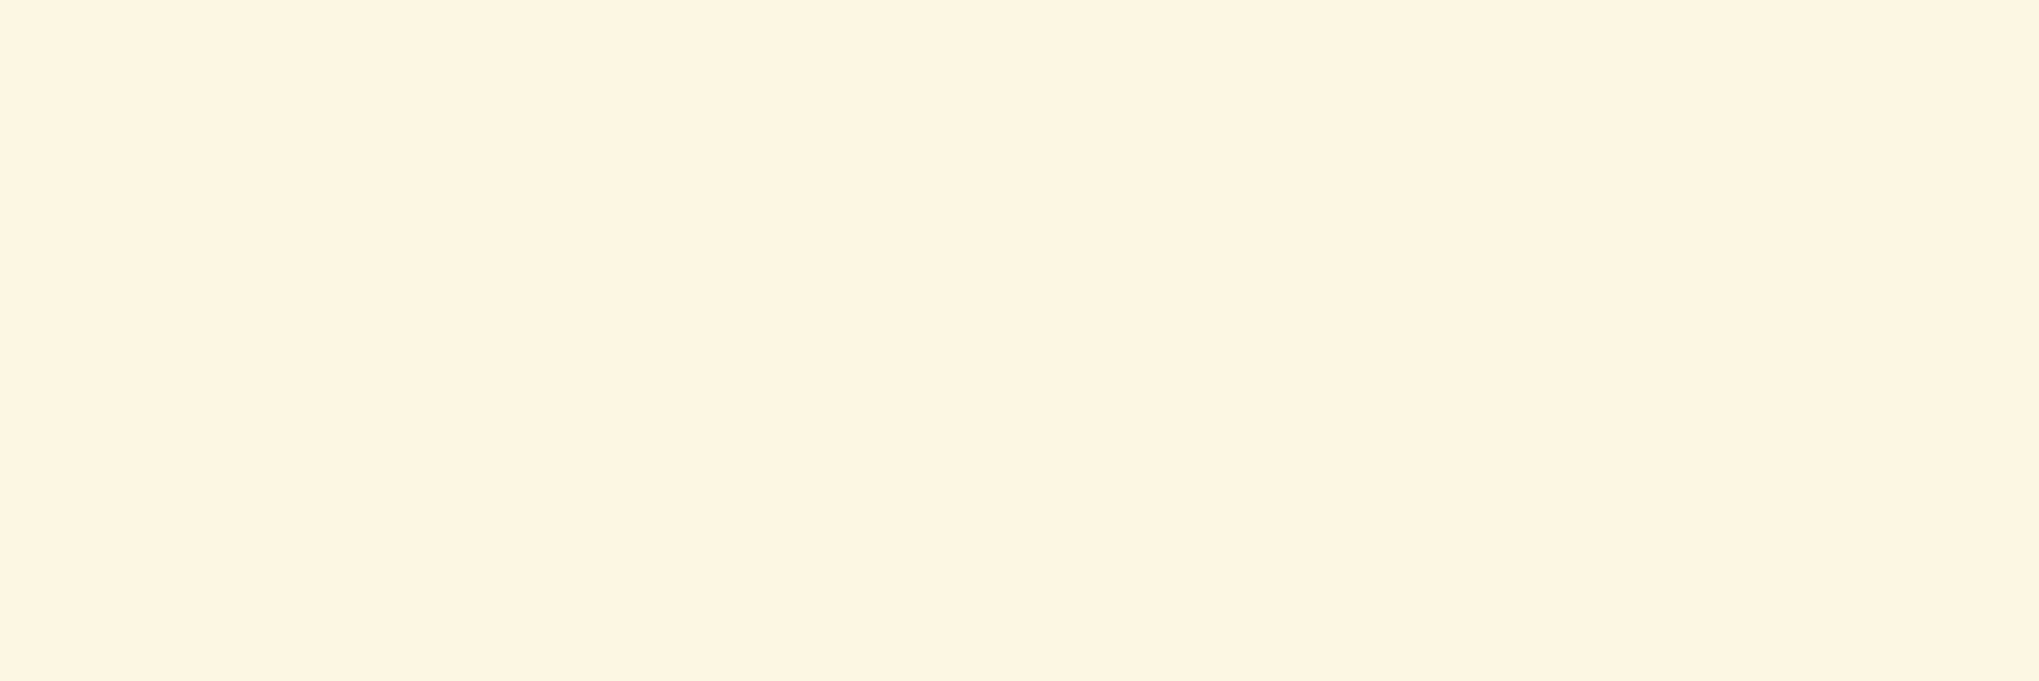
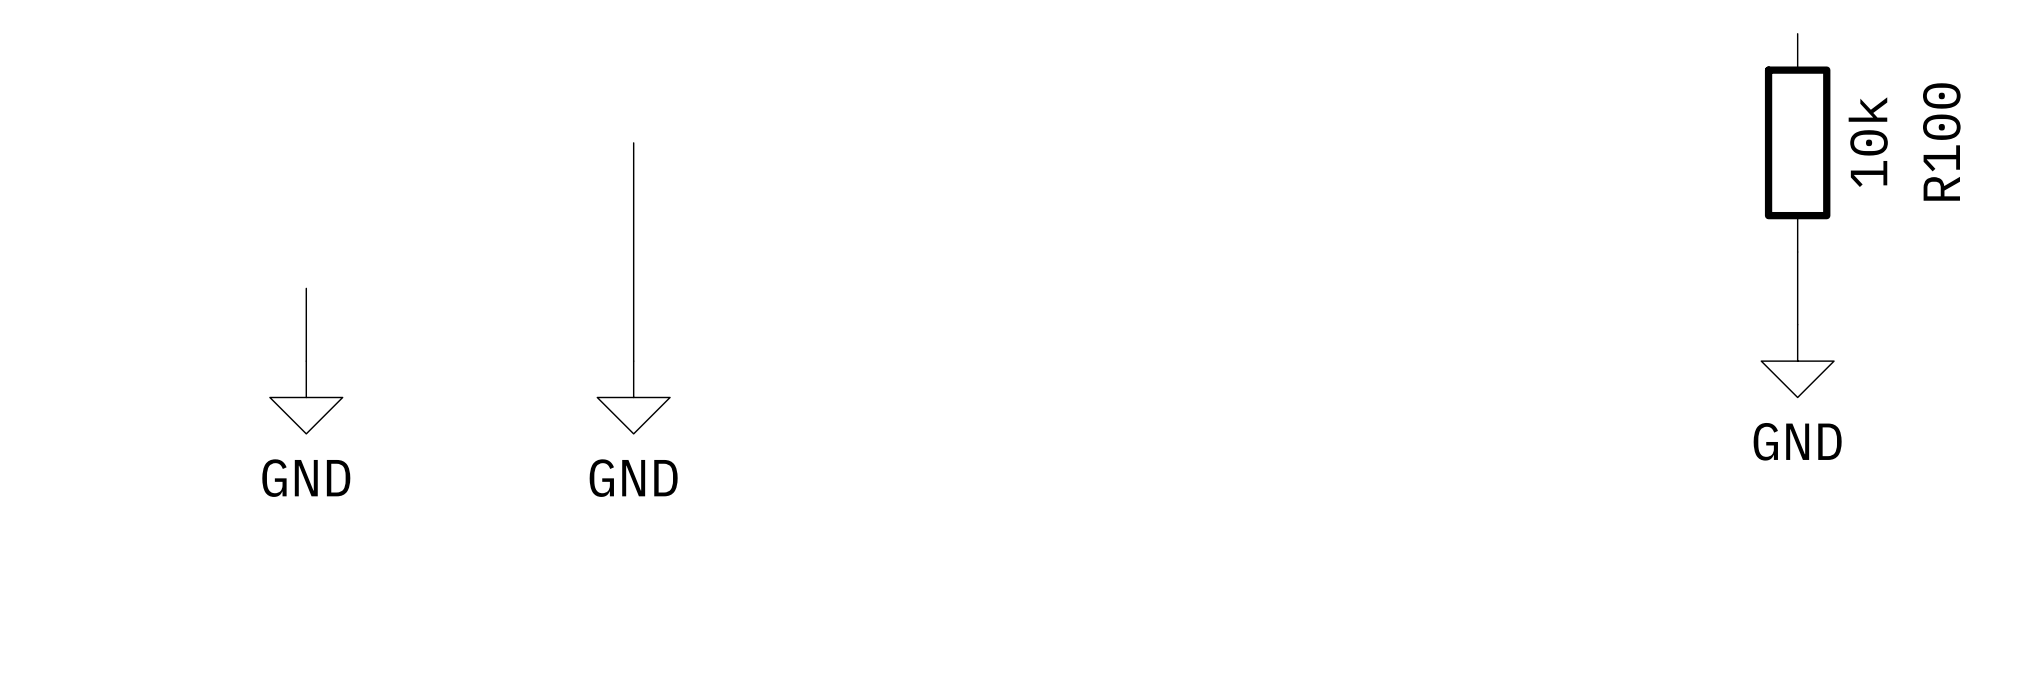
wire: none -> (633, 142) (633, 361)
R100: none -> 10k (1797, 142)
wire: none -> (1797, 251) (1797, 324)
wire: none -> (306, 288) (306, 361)
power symbol: none -> GND (1797, 361)
power symbol: none -> GND (306, 397)
power symbol: none -> GND (633, 397)

